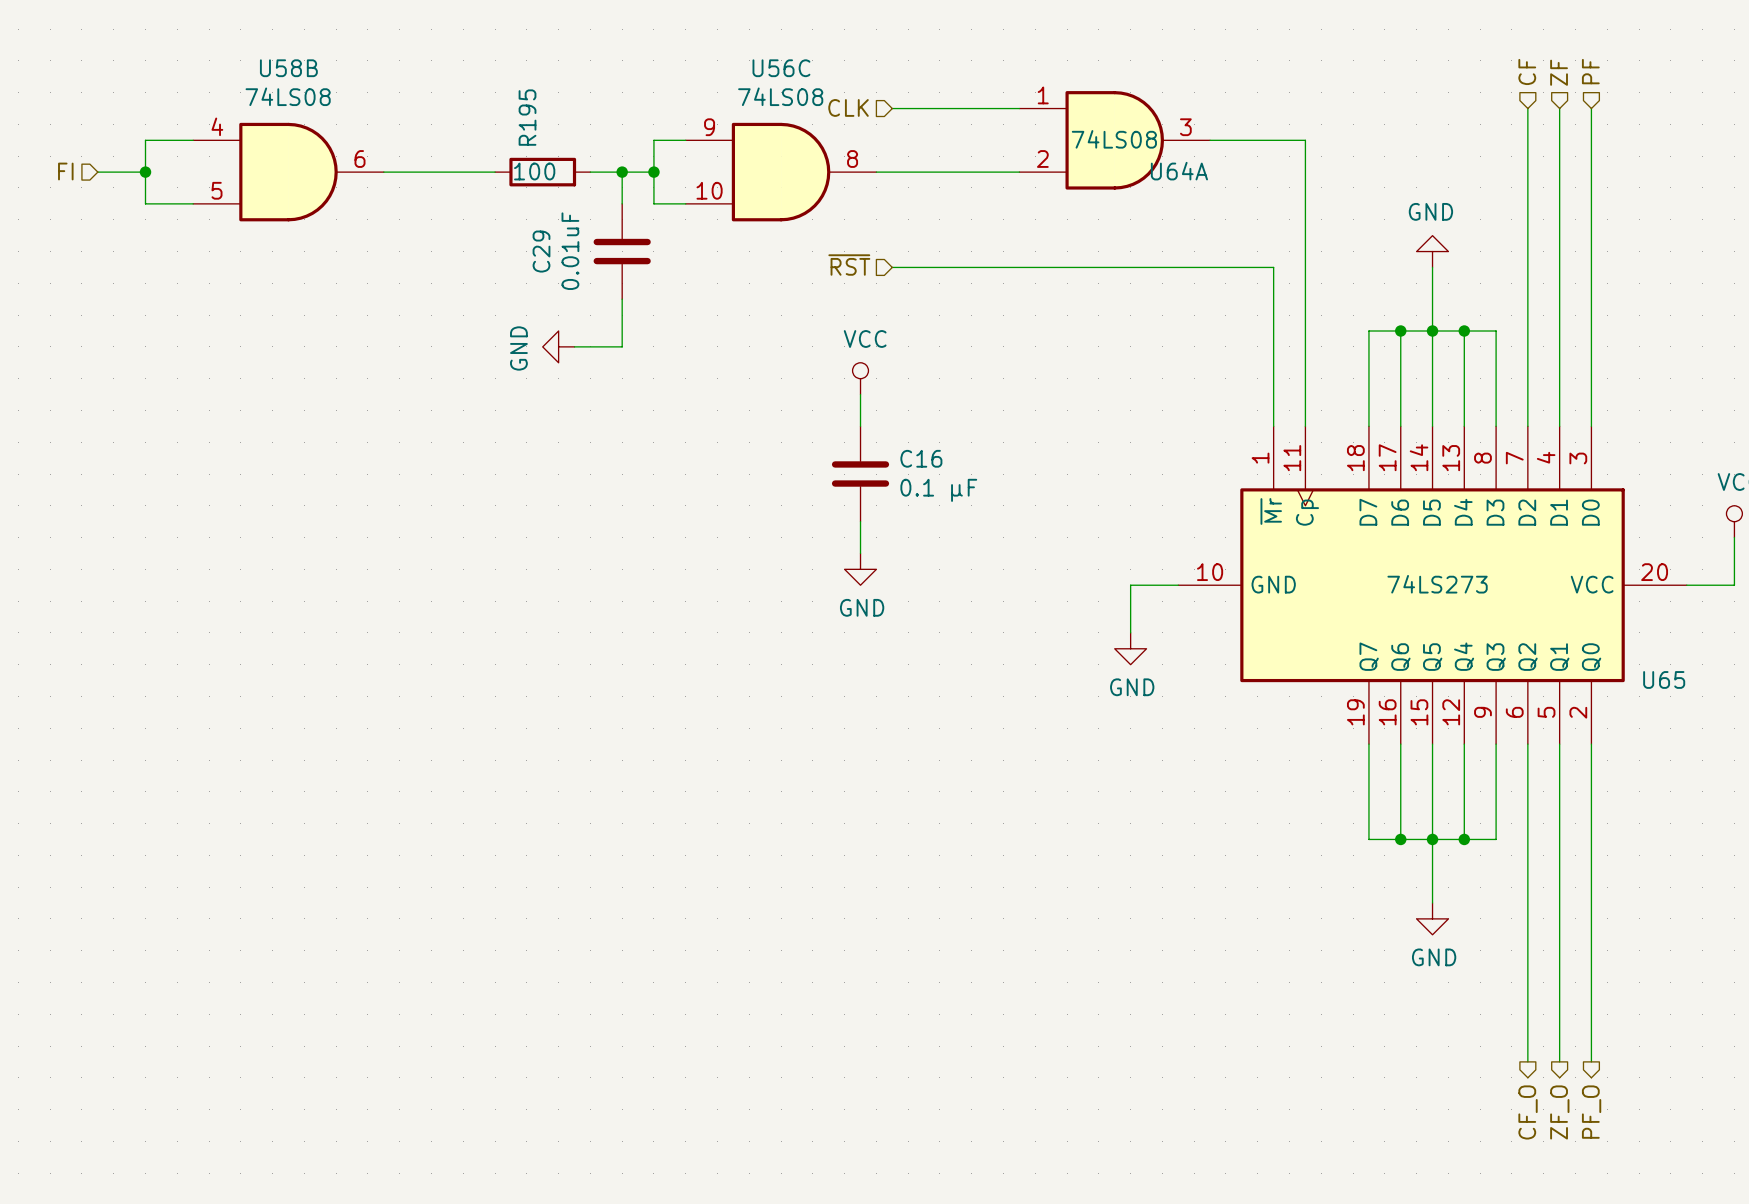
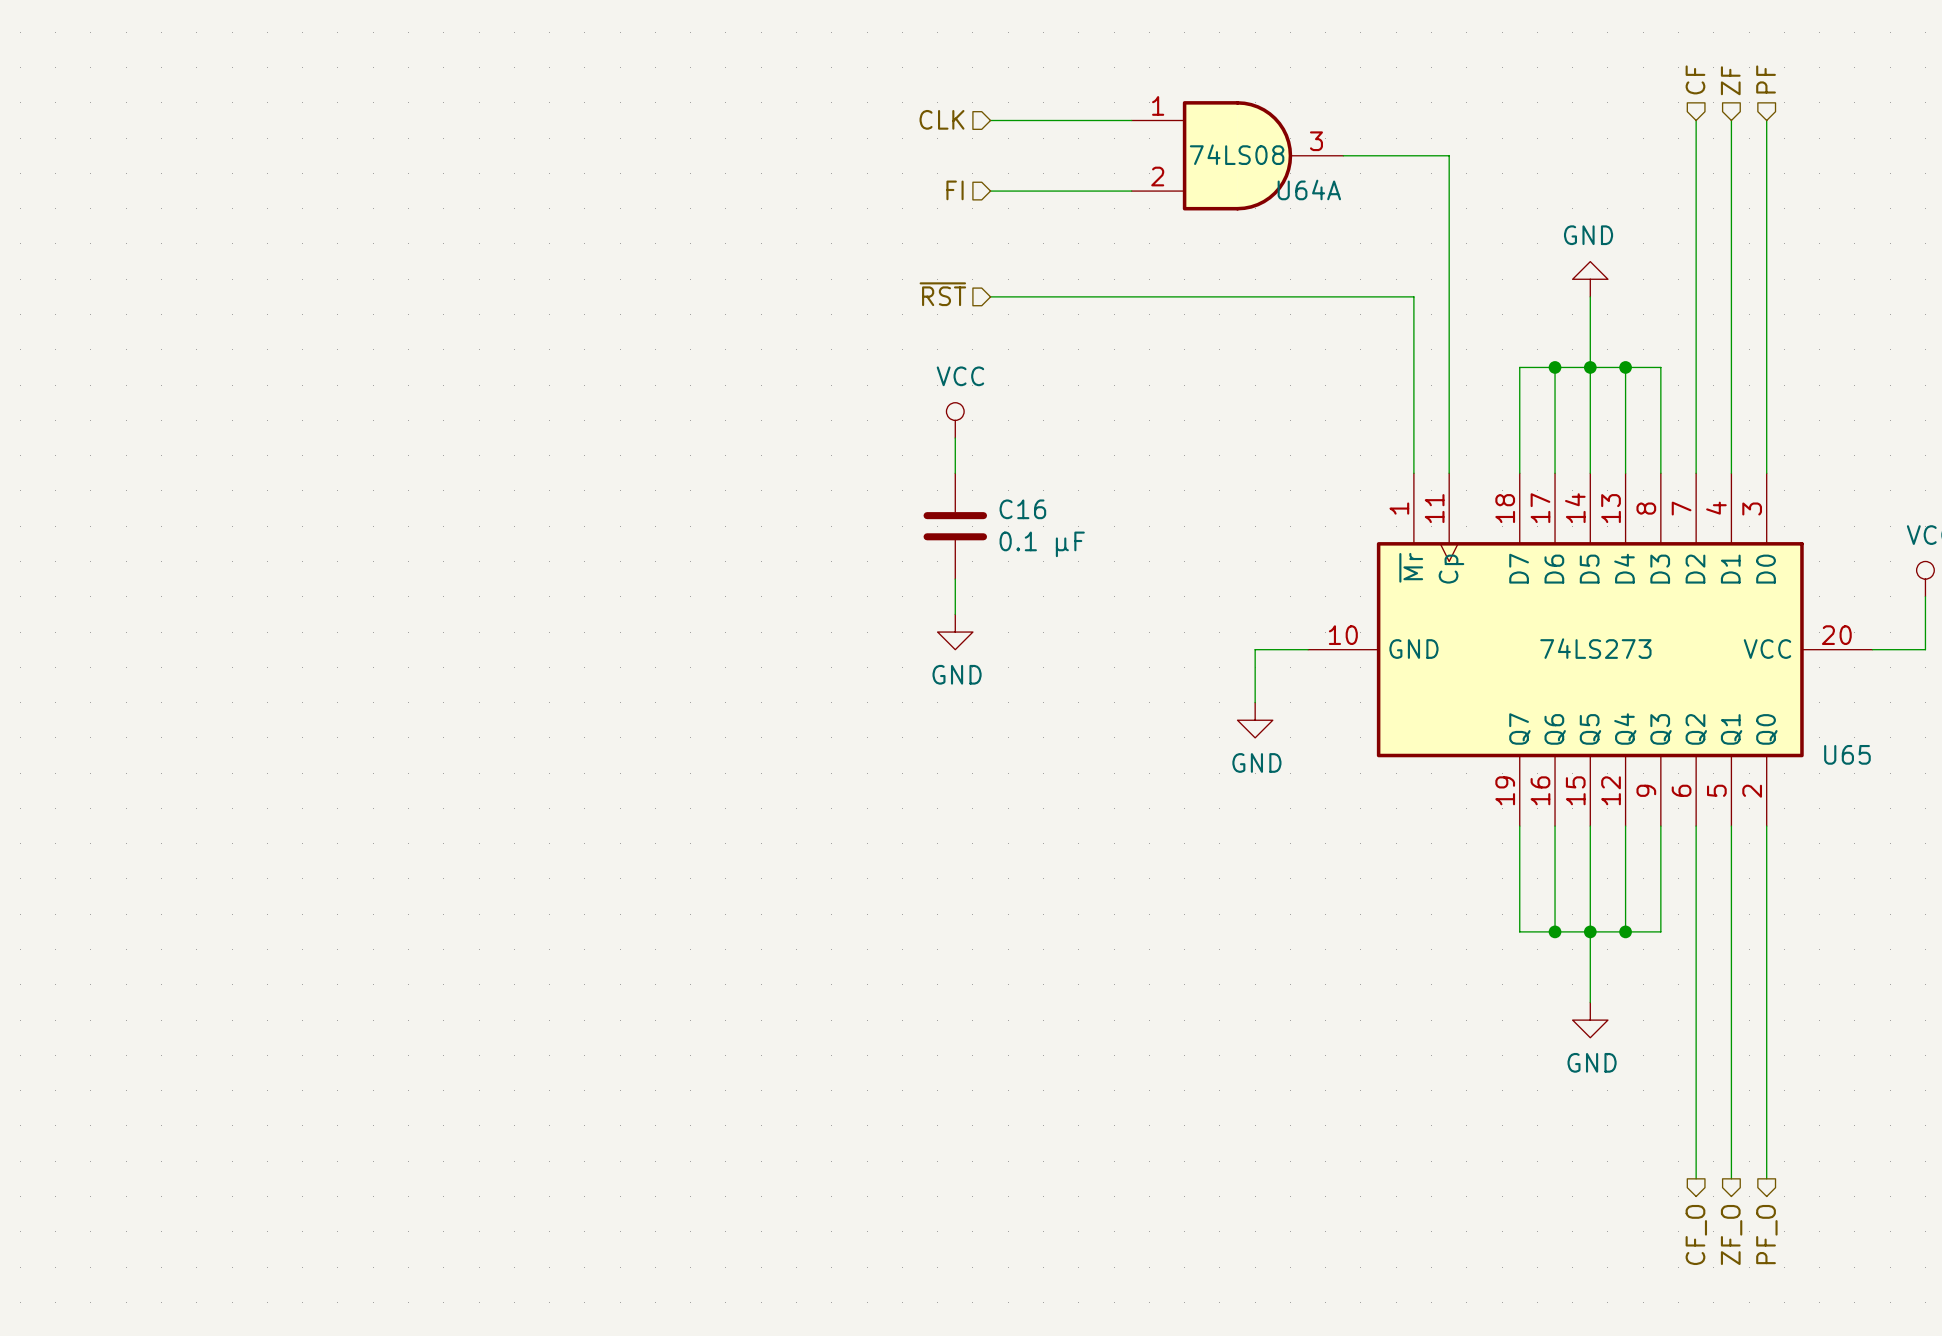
wire: (193, 140) (145, 140) (145, 203) (193, 203) -> none
wire: (685, 140) (653, 140) (653, 203) (685, 203) -> none
hierarchical label: FI (65, 171) -> none
hierarchical label: none -> FI (955, 190)
wire: (97, 172) (145, 172) -> none
junction: (145, 172) -> none
U58B: 74LS08 (288, 172) -> none
wire: (383, 172) (495, 172) -> none
R195: 100 (542, 172) -> none
wire: (590, 172) (653, 172) -> none
wire: (622, 172) (622, 203) -> none
junction: (622, 172) -> none
junction: (653, 172) -> none
U56C: 74LS08 (781, 172) -> none
wire: (876, 172) (892, 172) -> none
C29: 0.01uF (622, 251) -> none
wire: (622, 299) (622, 346) (574, 346) -> none
power symbol: GND (558, 346) -> none

